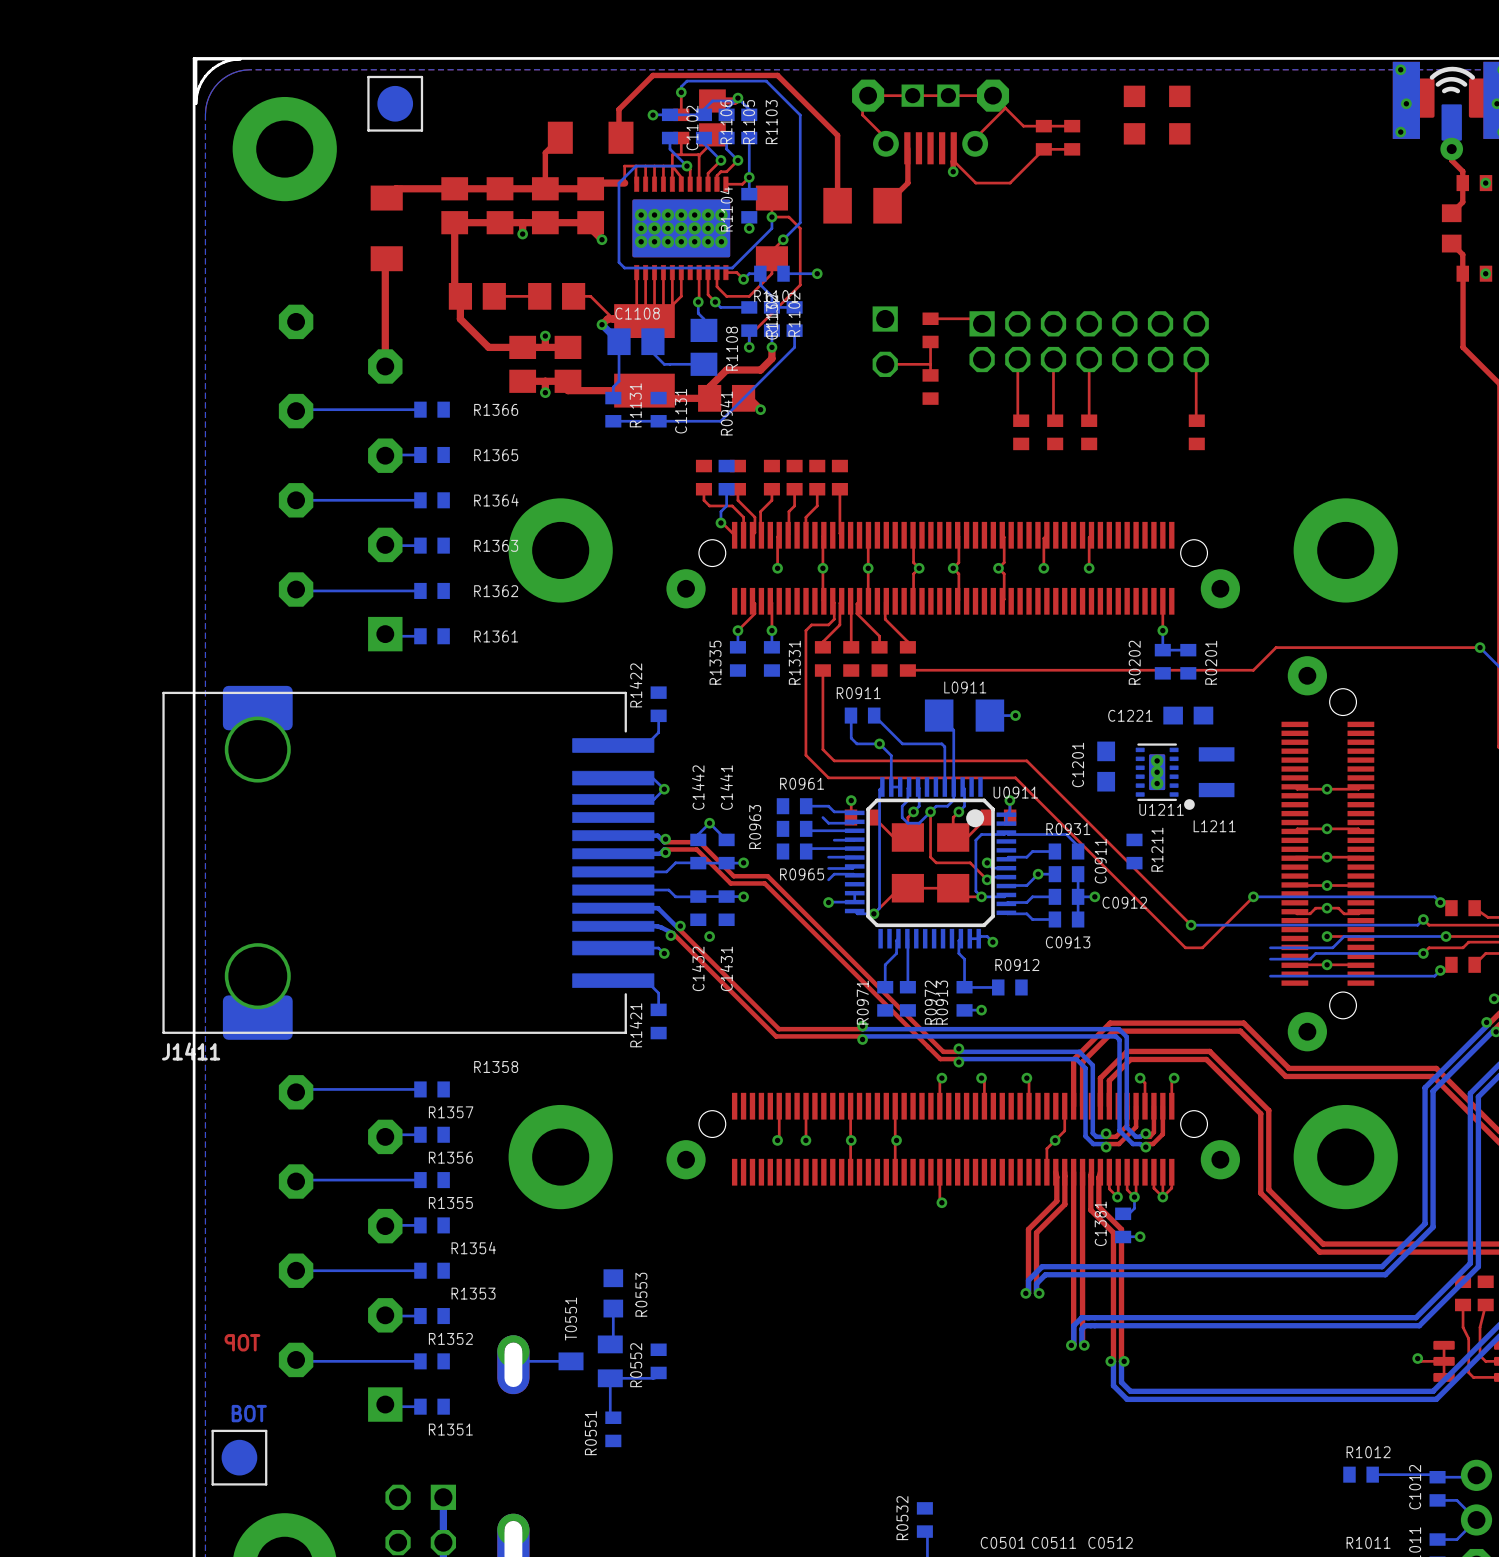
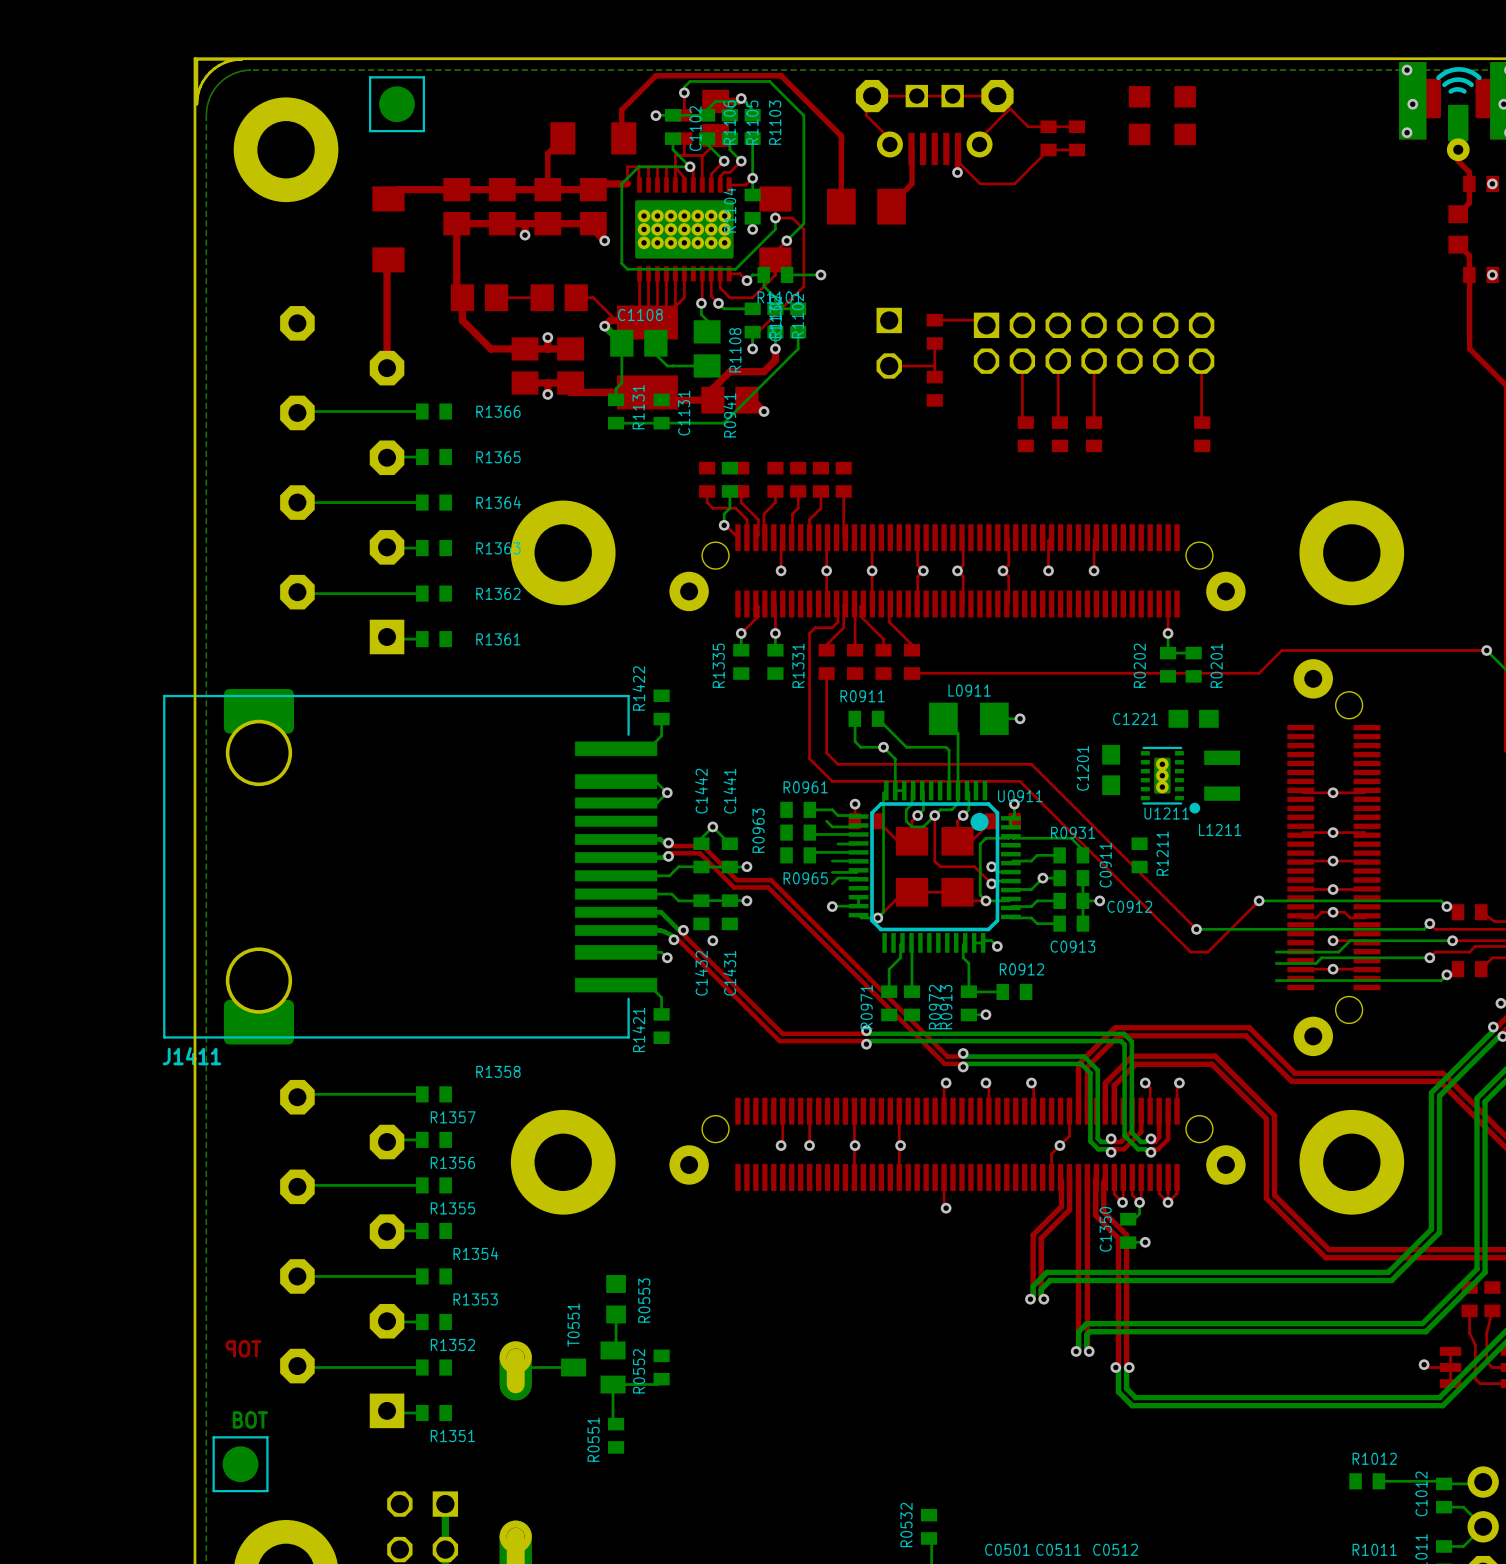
C1381 name: C1381 (1100, 1223) -> C1350 (1105, 1229)

